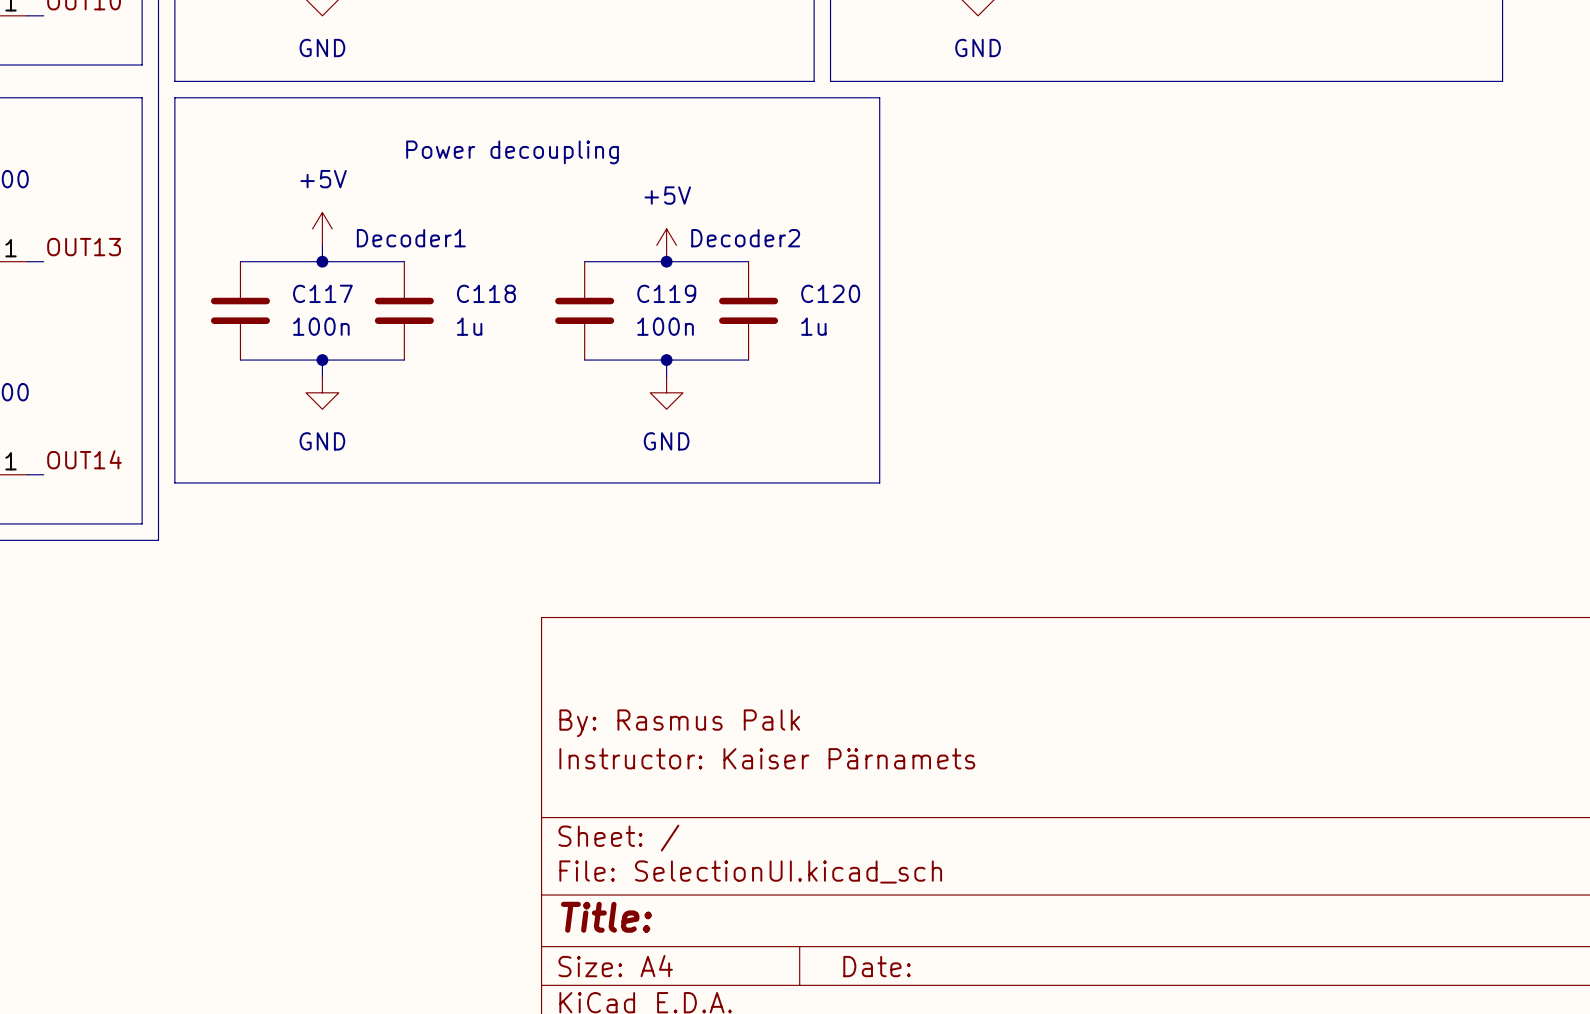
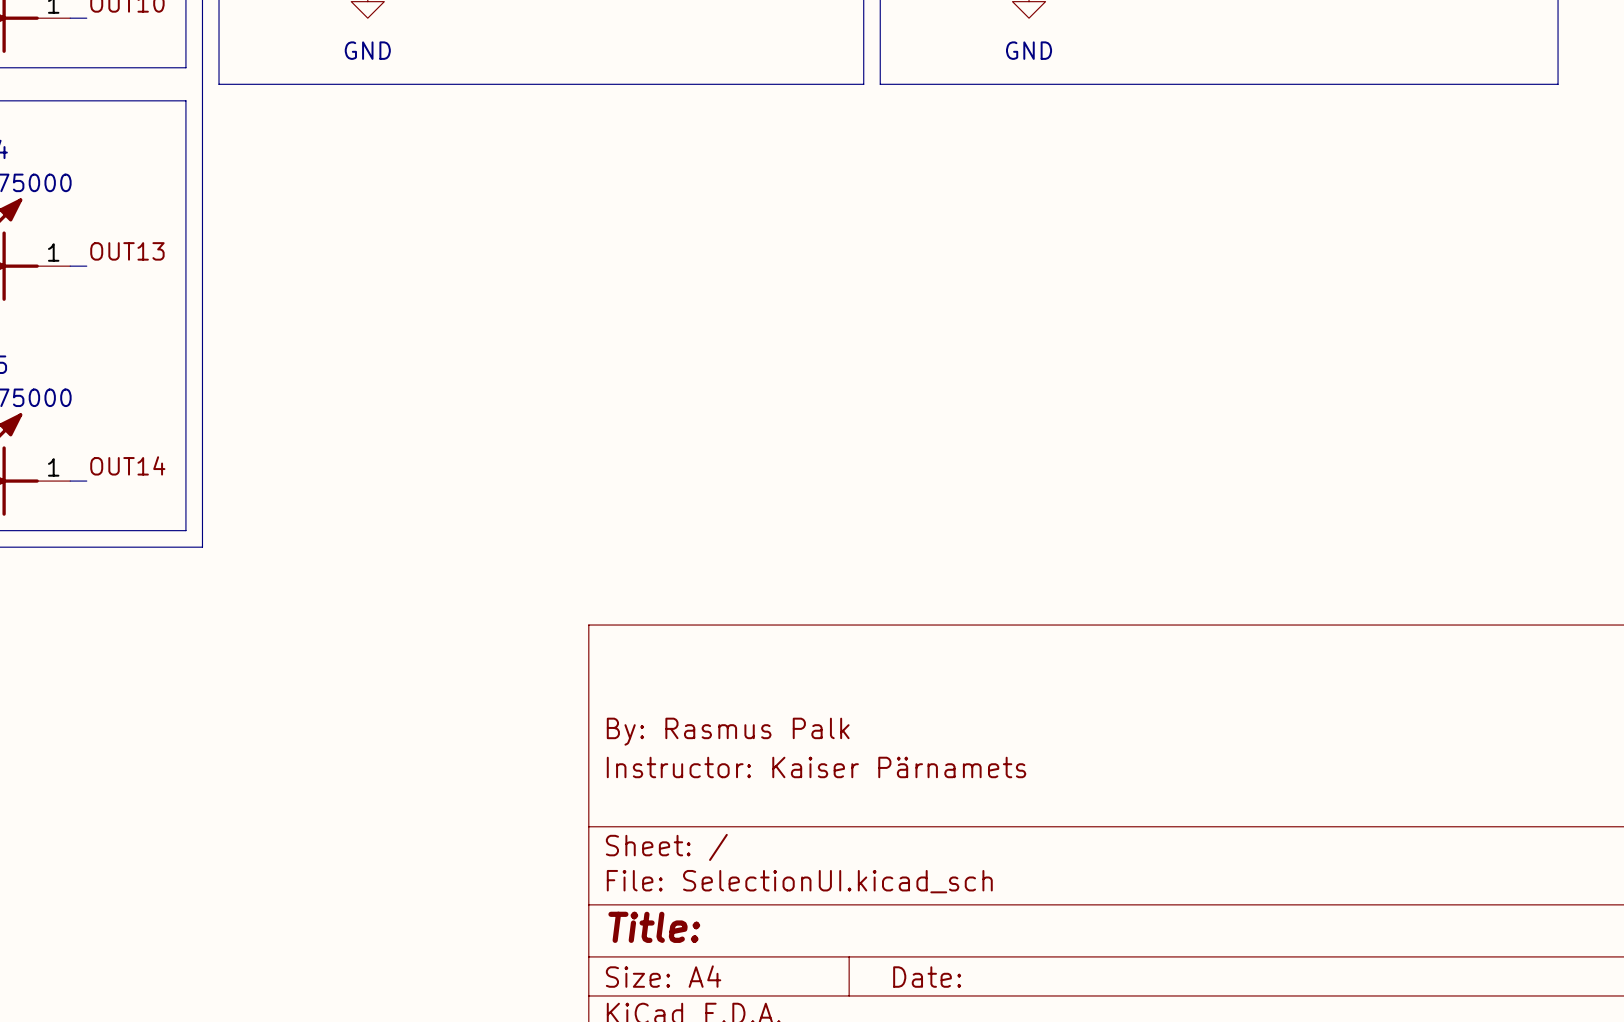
line: (174, 97) (174, 482) (879, 482) (879, 97) (174, 97) -> none
text: Power decoupling (512, 152) -> none
power symbol: +5V (322, 228) -> none
text: Decoder1 (411, 238) -> none
text: Decoder2 (745, 238) -> none
wire: (322, 245) (322, 261) -> none
power symbol: +5V (666, 245) -> none
wire: (240, 261) (404, 261) -> none
junction: (322, 261) -> none
wire: (584, 261) (748, 261) -> none
junction: (666, 261) -> none
C117: 100n (240, 310) -> none
C118: 1u (404, 310) -> none
C119: 100n (584, 310) -> none
C120: 1u (748, 310) -> none
wire: (240, 360) (404, 360) -> none
wire: (322, 360) (322, 376) -> none
junction: (322, 360) -> none
wire: (584, 360) (748, 360) -> none
wire: (666, 360) (666, 376) -> none
junction: (666, 360) -> none
power symbol: GND (322, 392) -> none
power symbol: GND (666, 392) -> none

